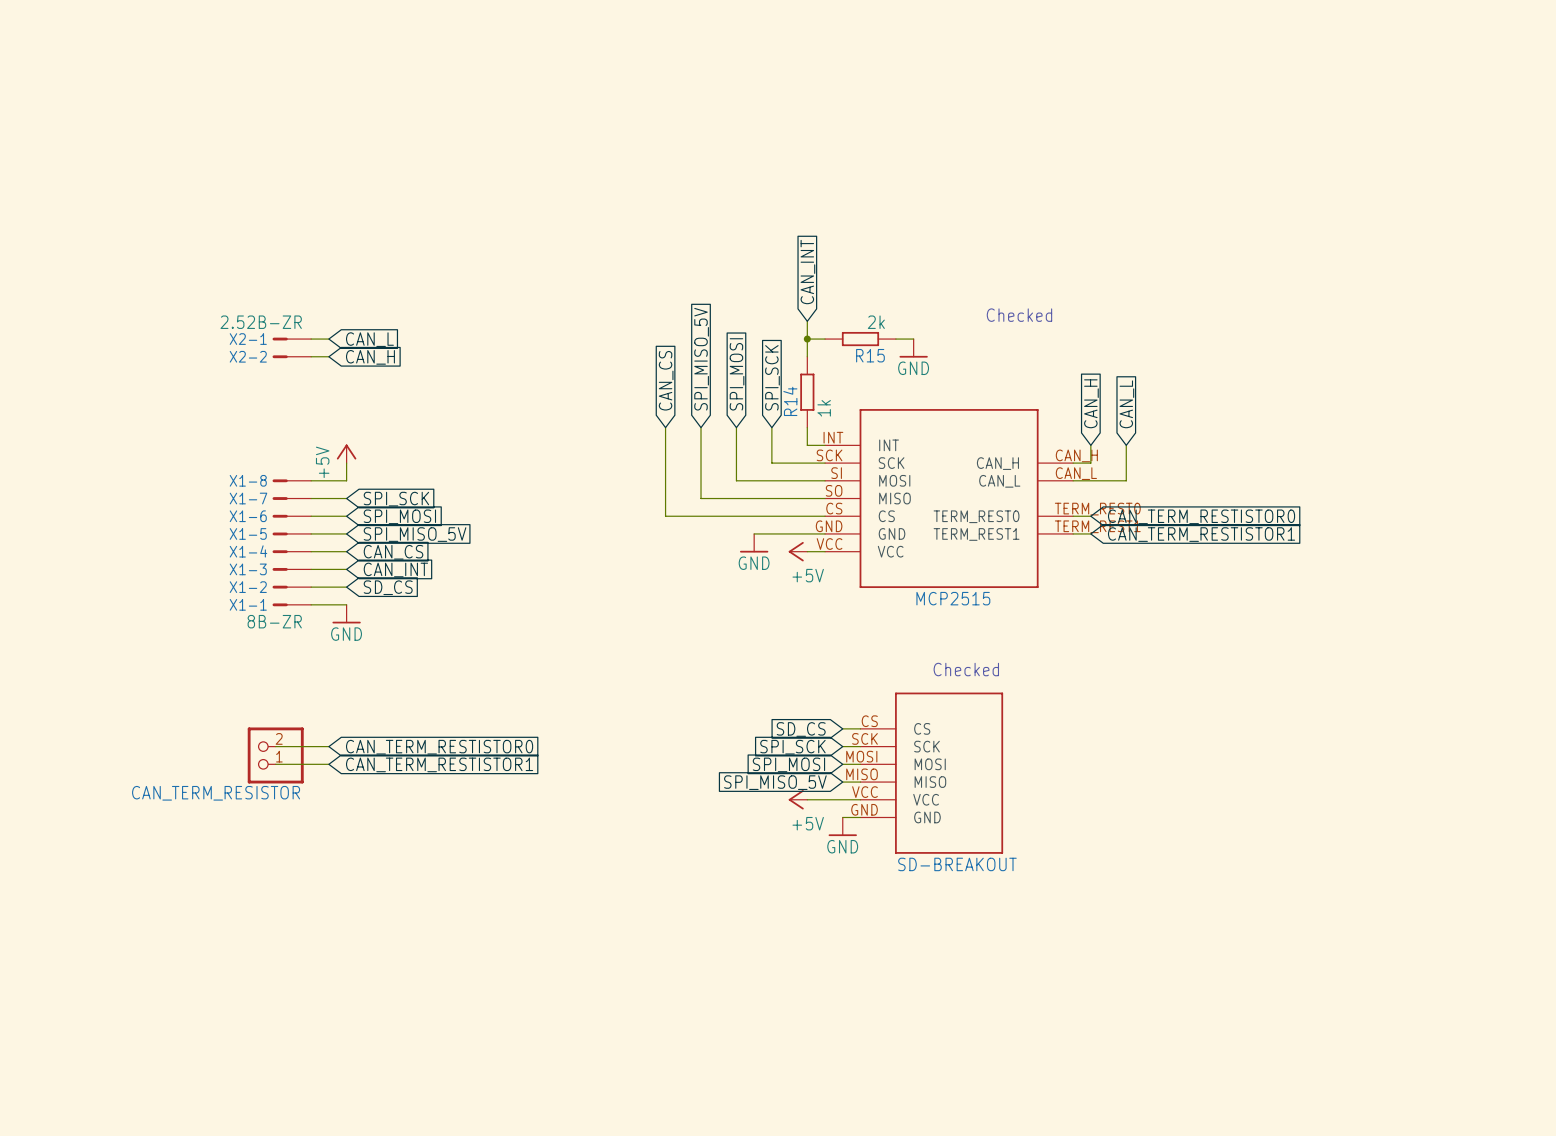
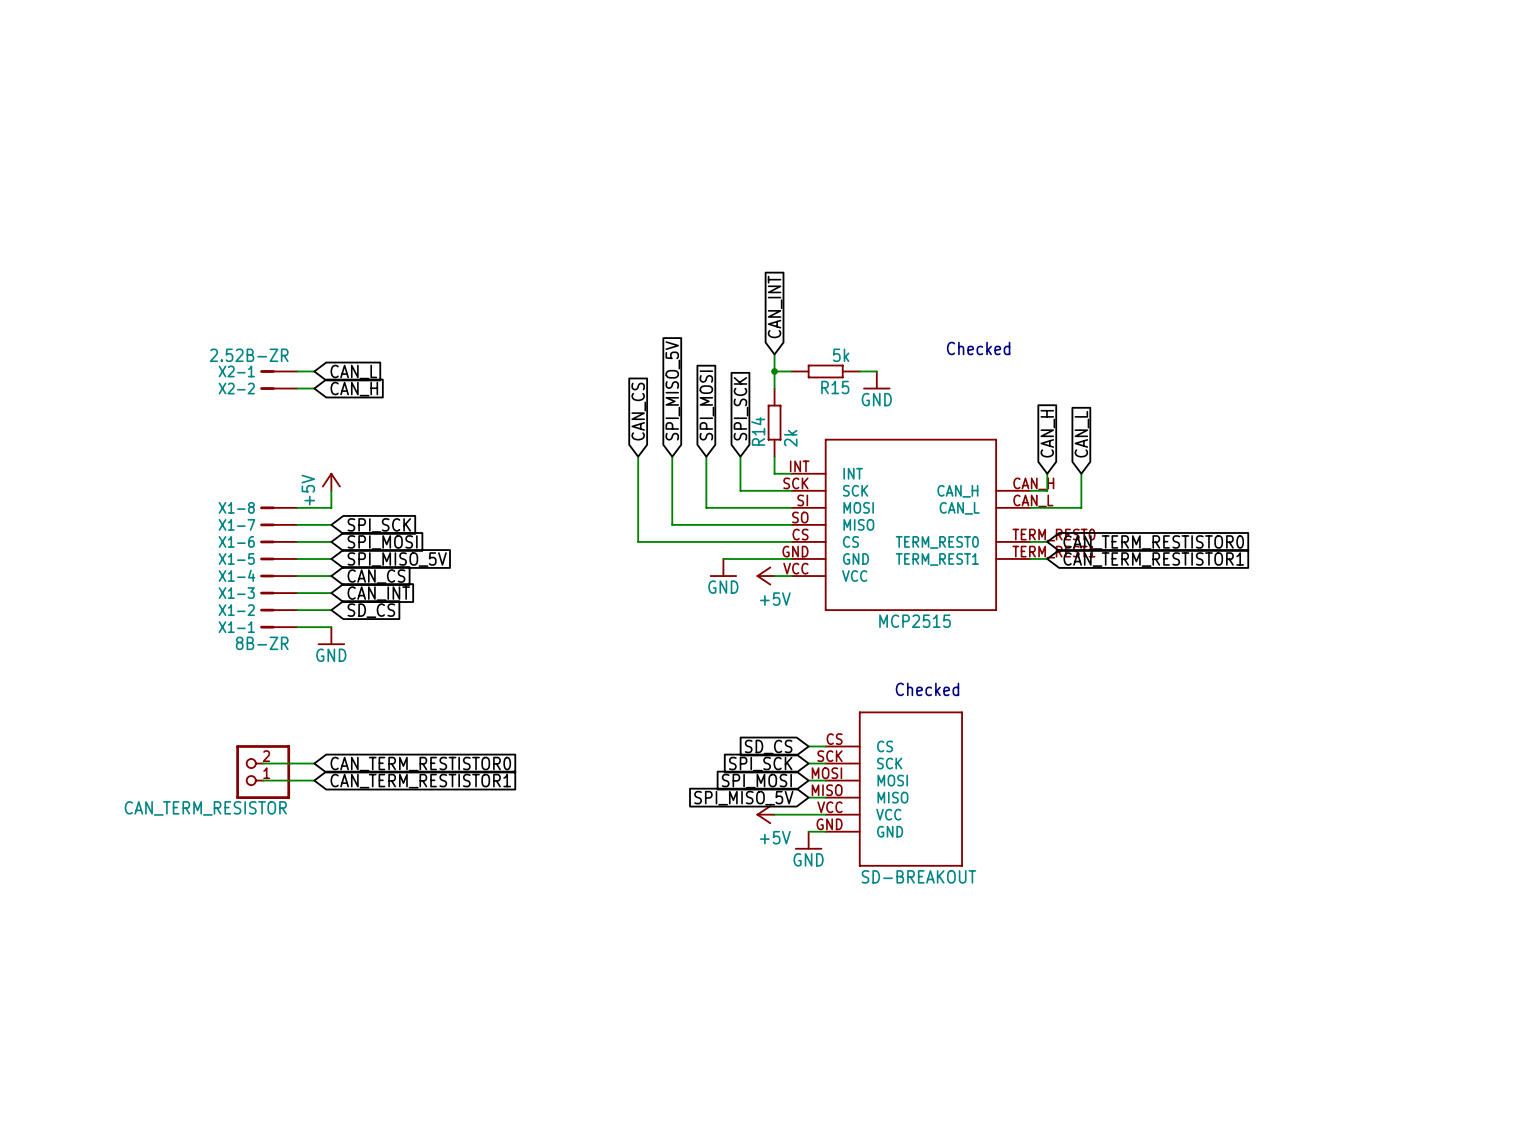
R15 value: 2k (876, 322) -> 5k (841, 355)
R14 value: 1k (824, 408) -> 2k (790, 438)

